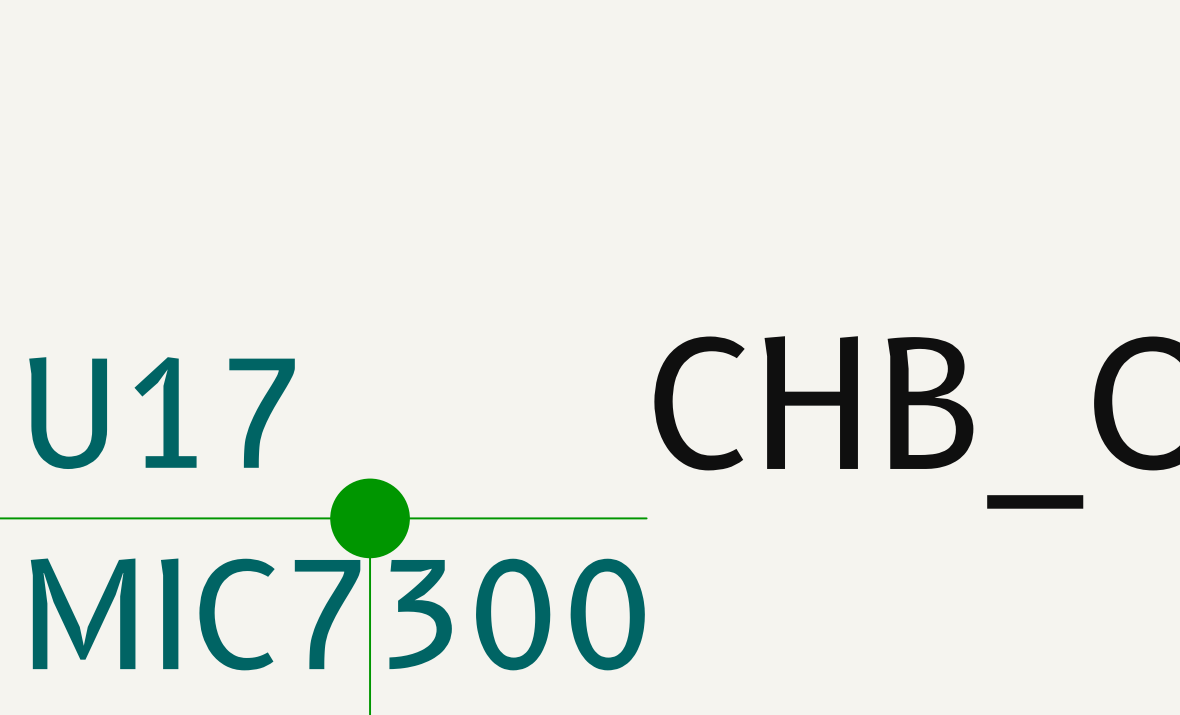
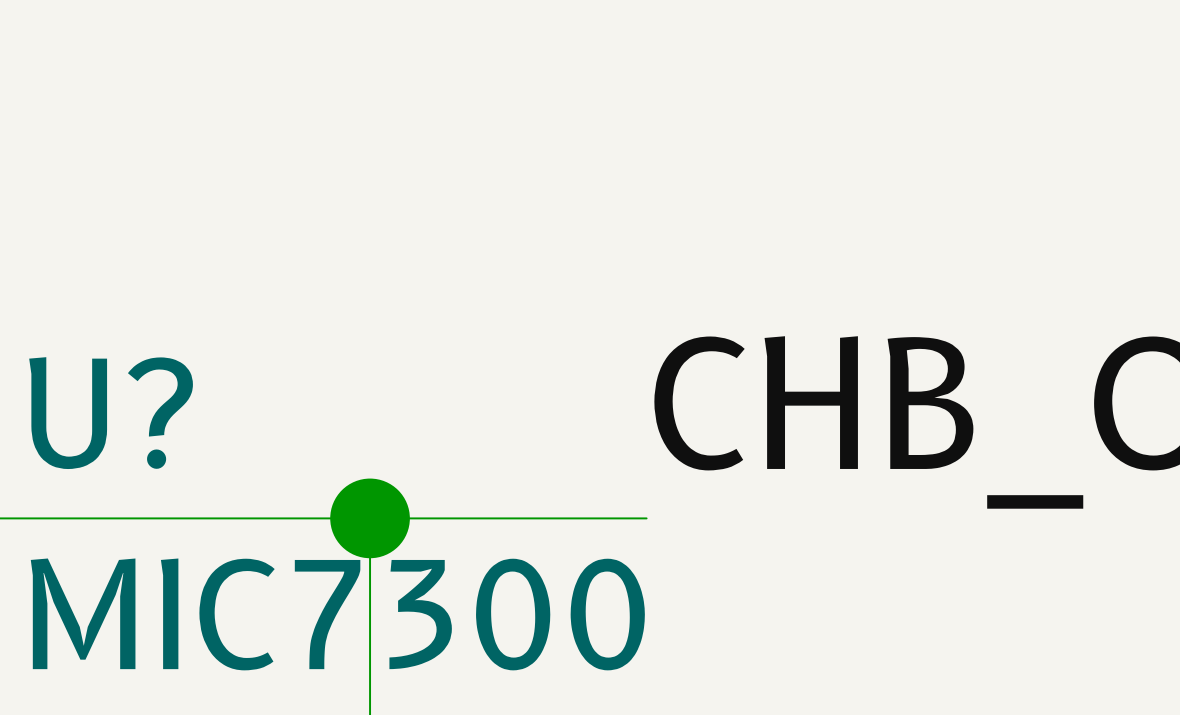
U17 name: U17 (162, 413) -> U? (111, 413)

